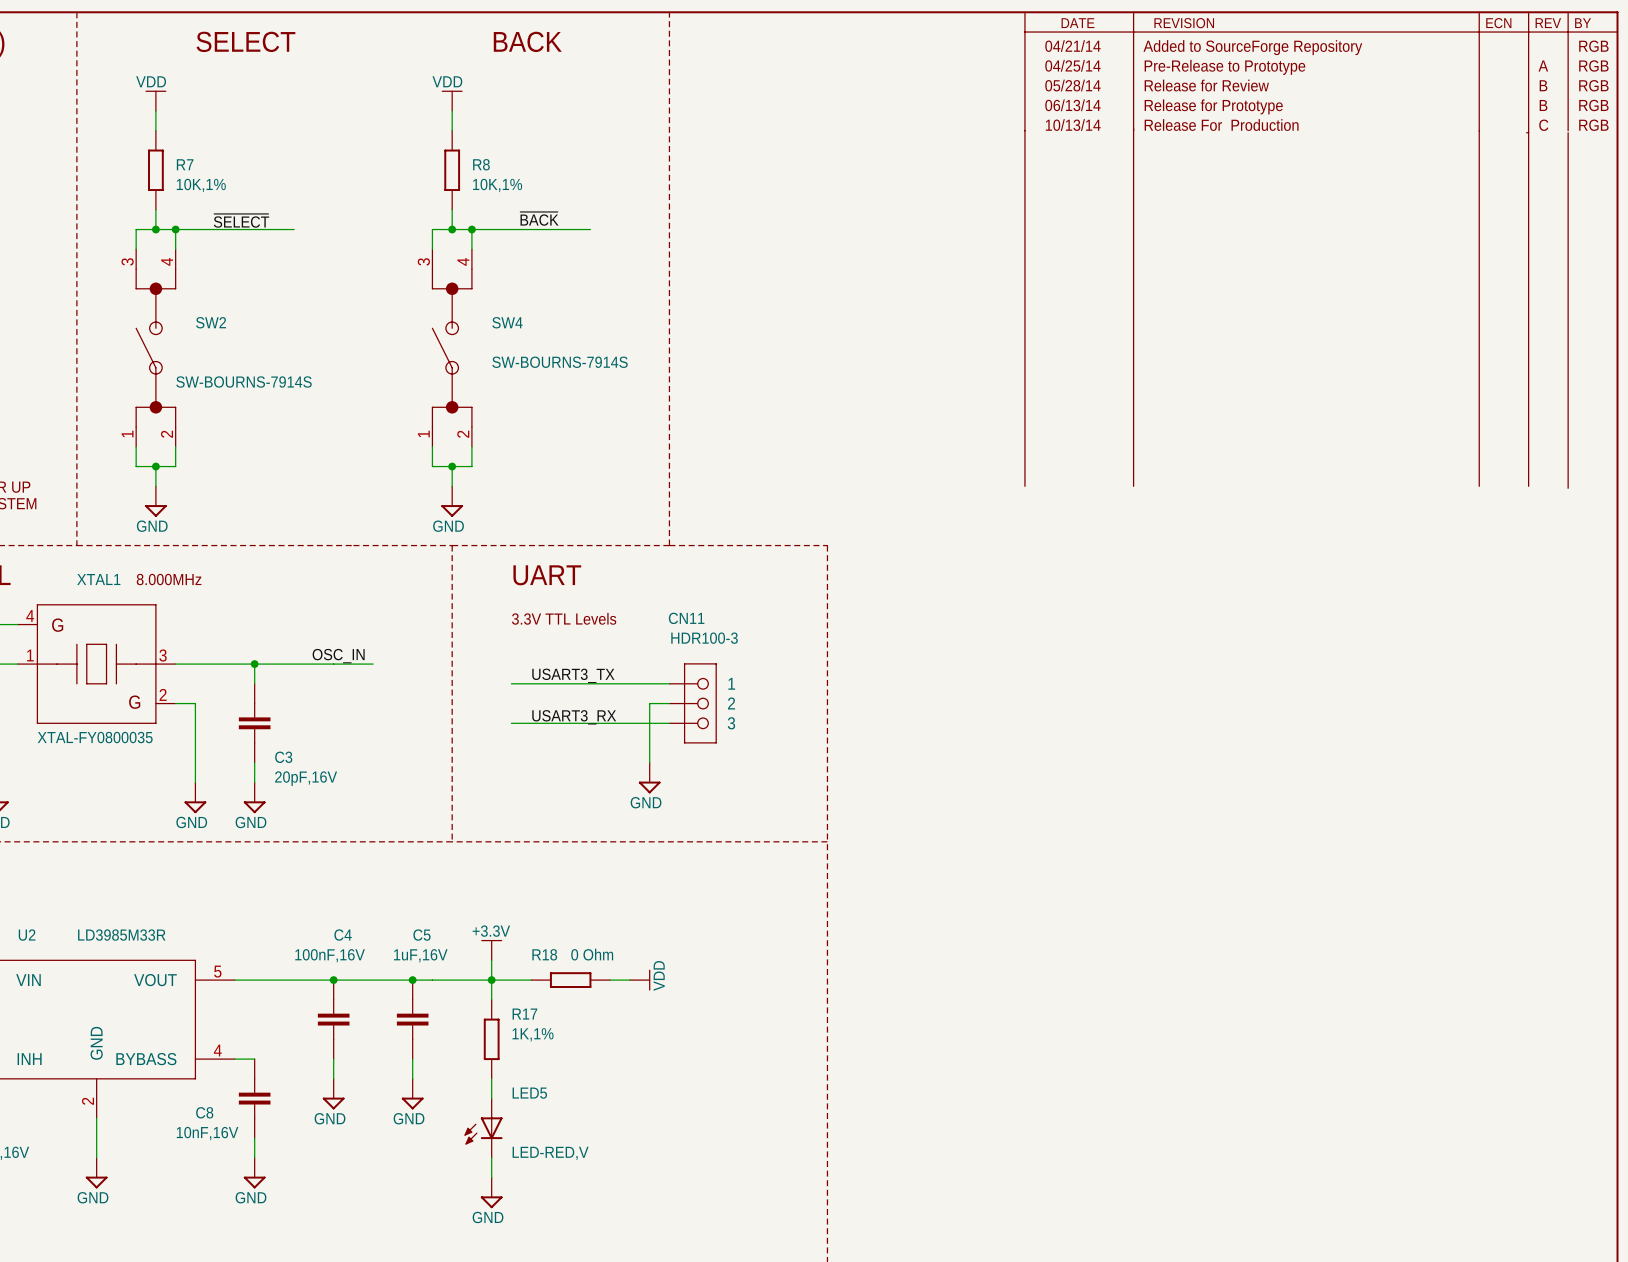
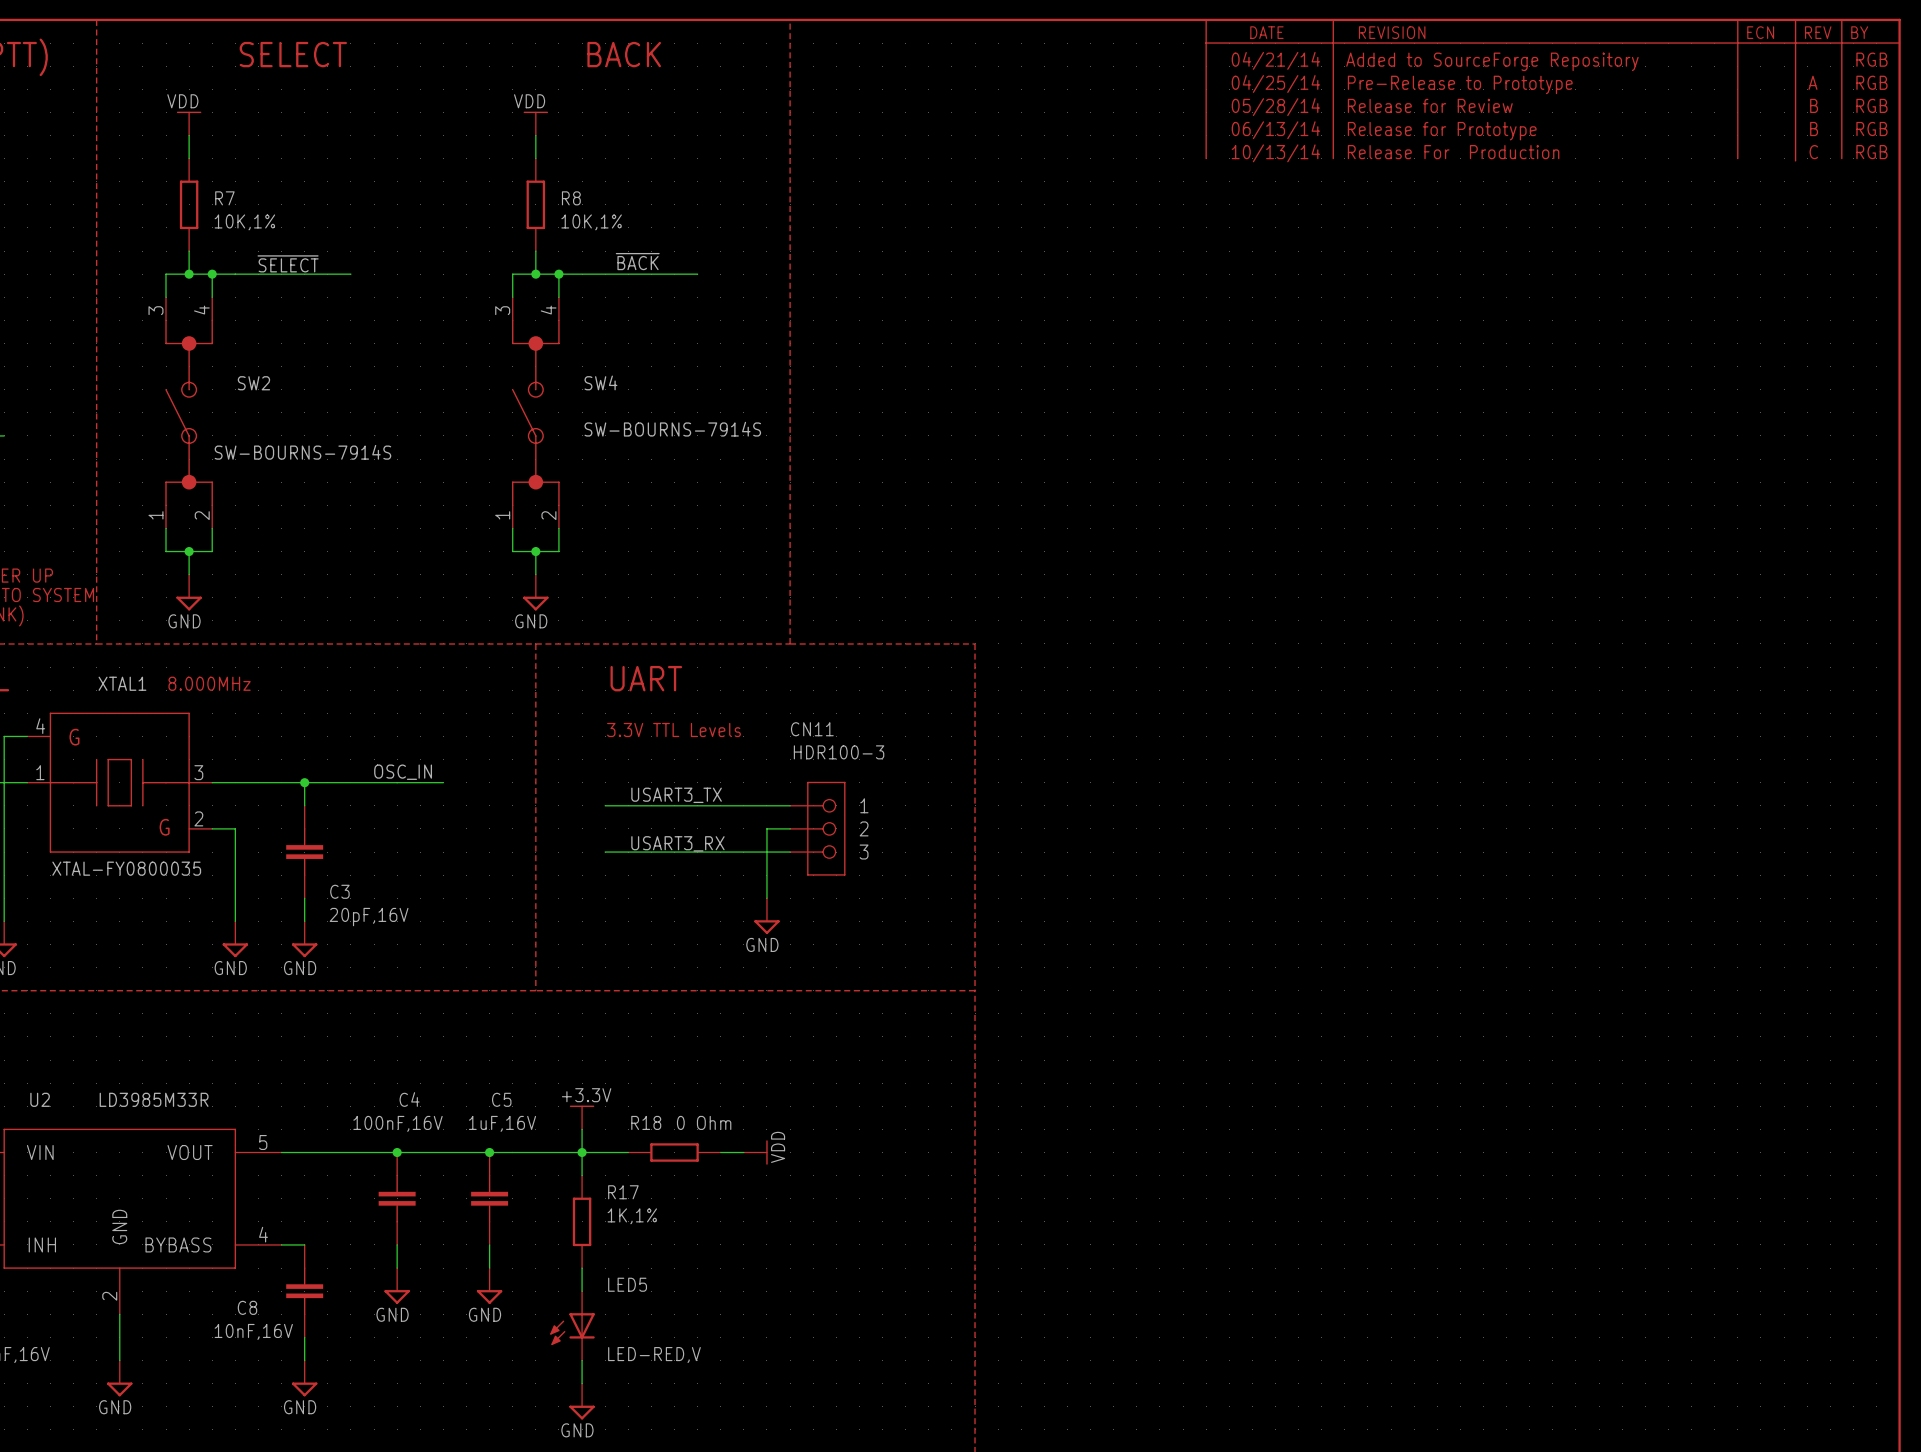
line: (1133, 128) (1133, 486) -> none
line: (1024, 130) (1024, 486) -> none
line: (1479, 130) (1479, 486) -> none
line: (1526, 132) (1528, 132) (1528, 486) -> none
line: (1568, 132) (1568, 488) -> none

